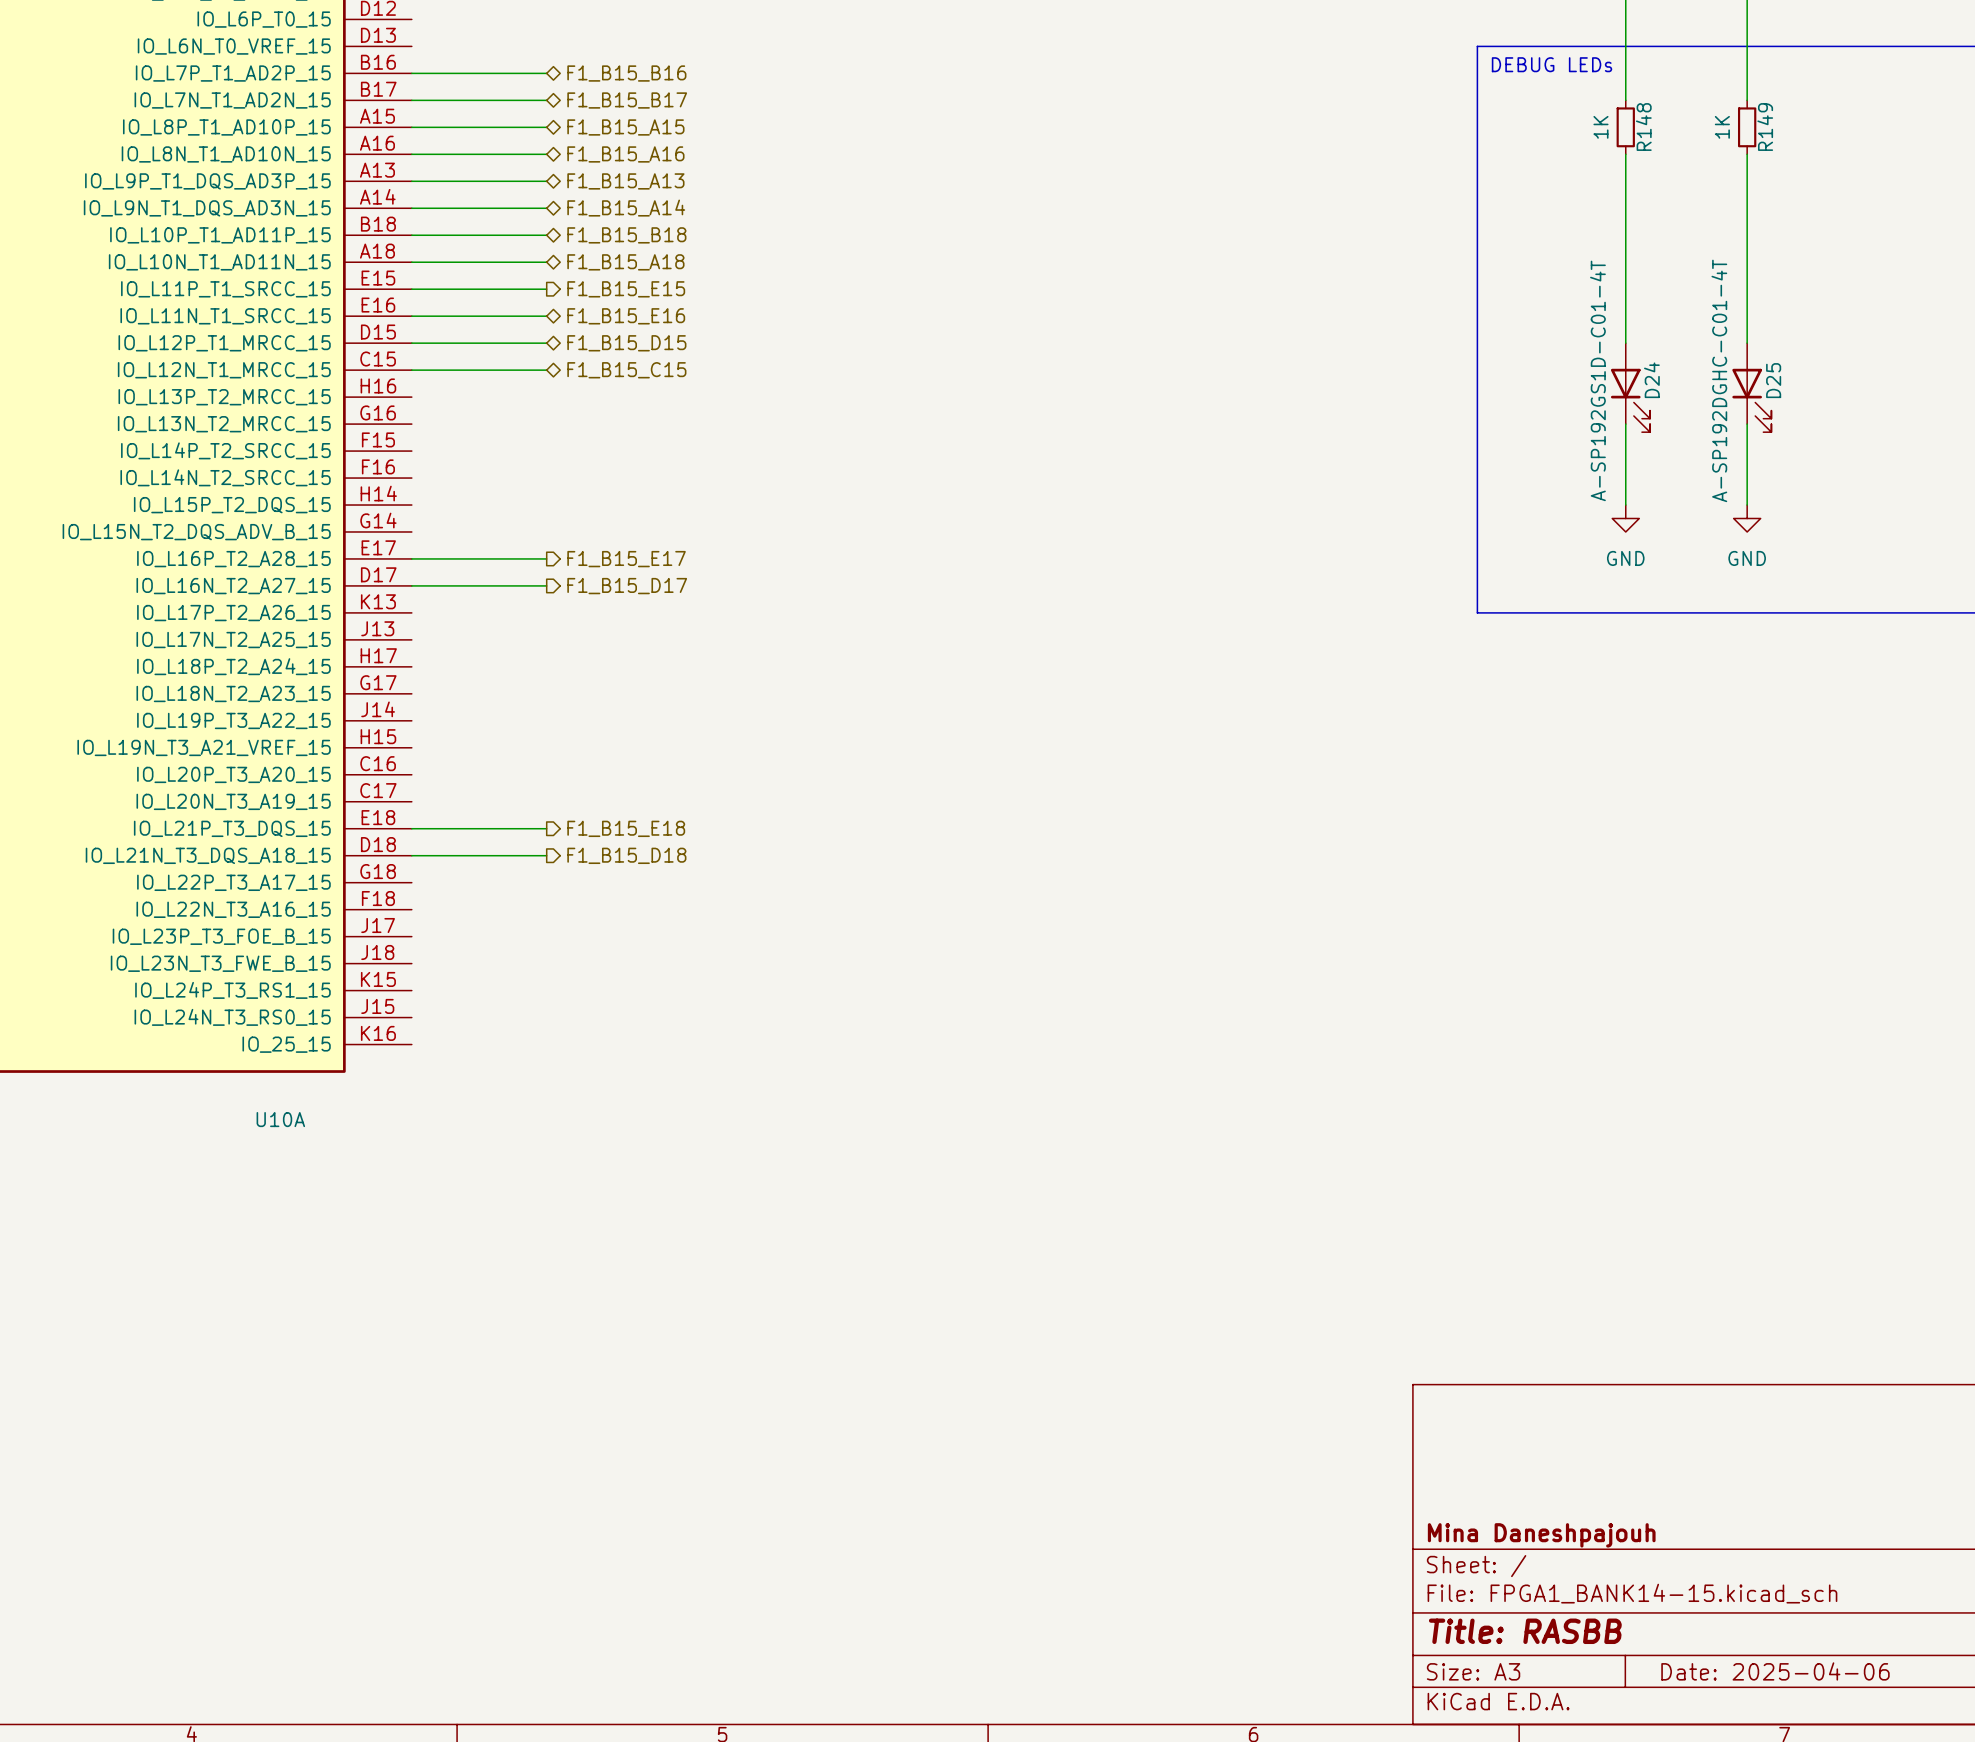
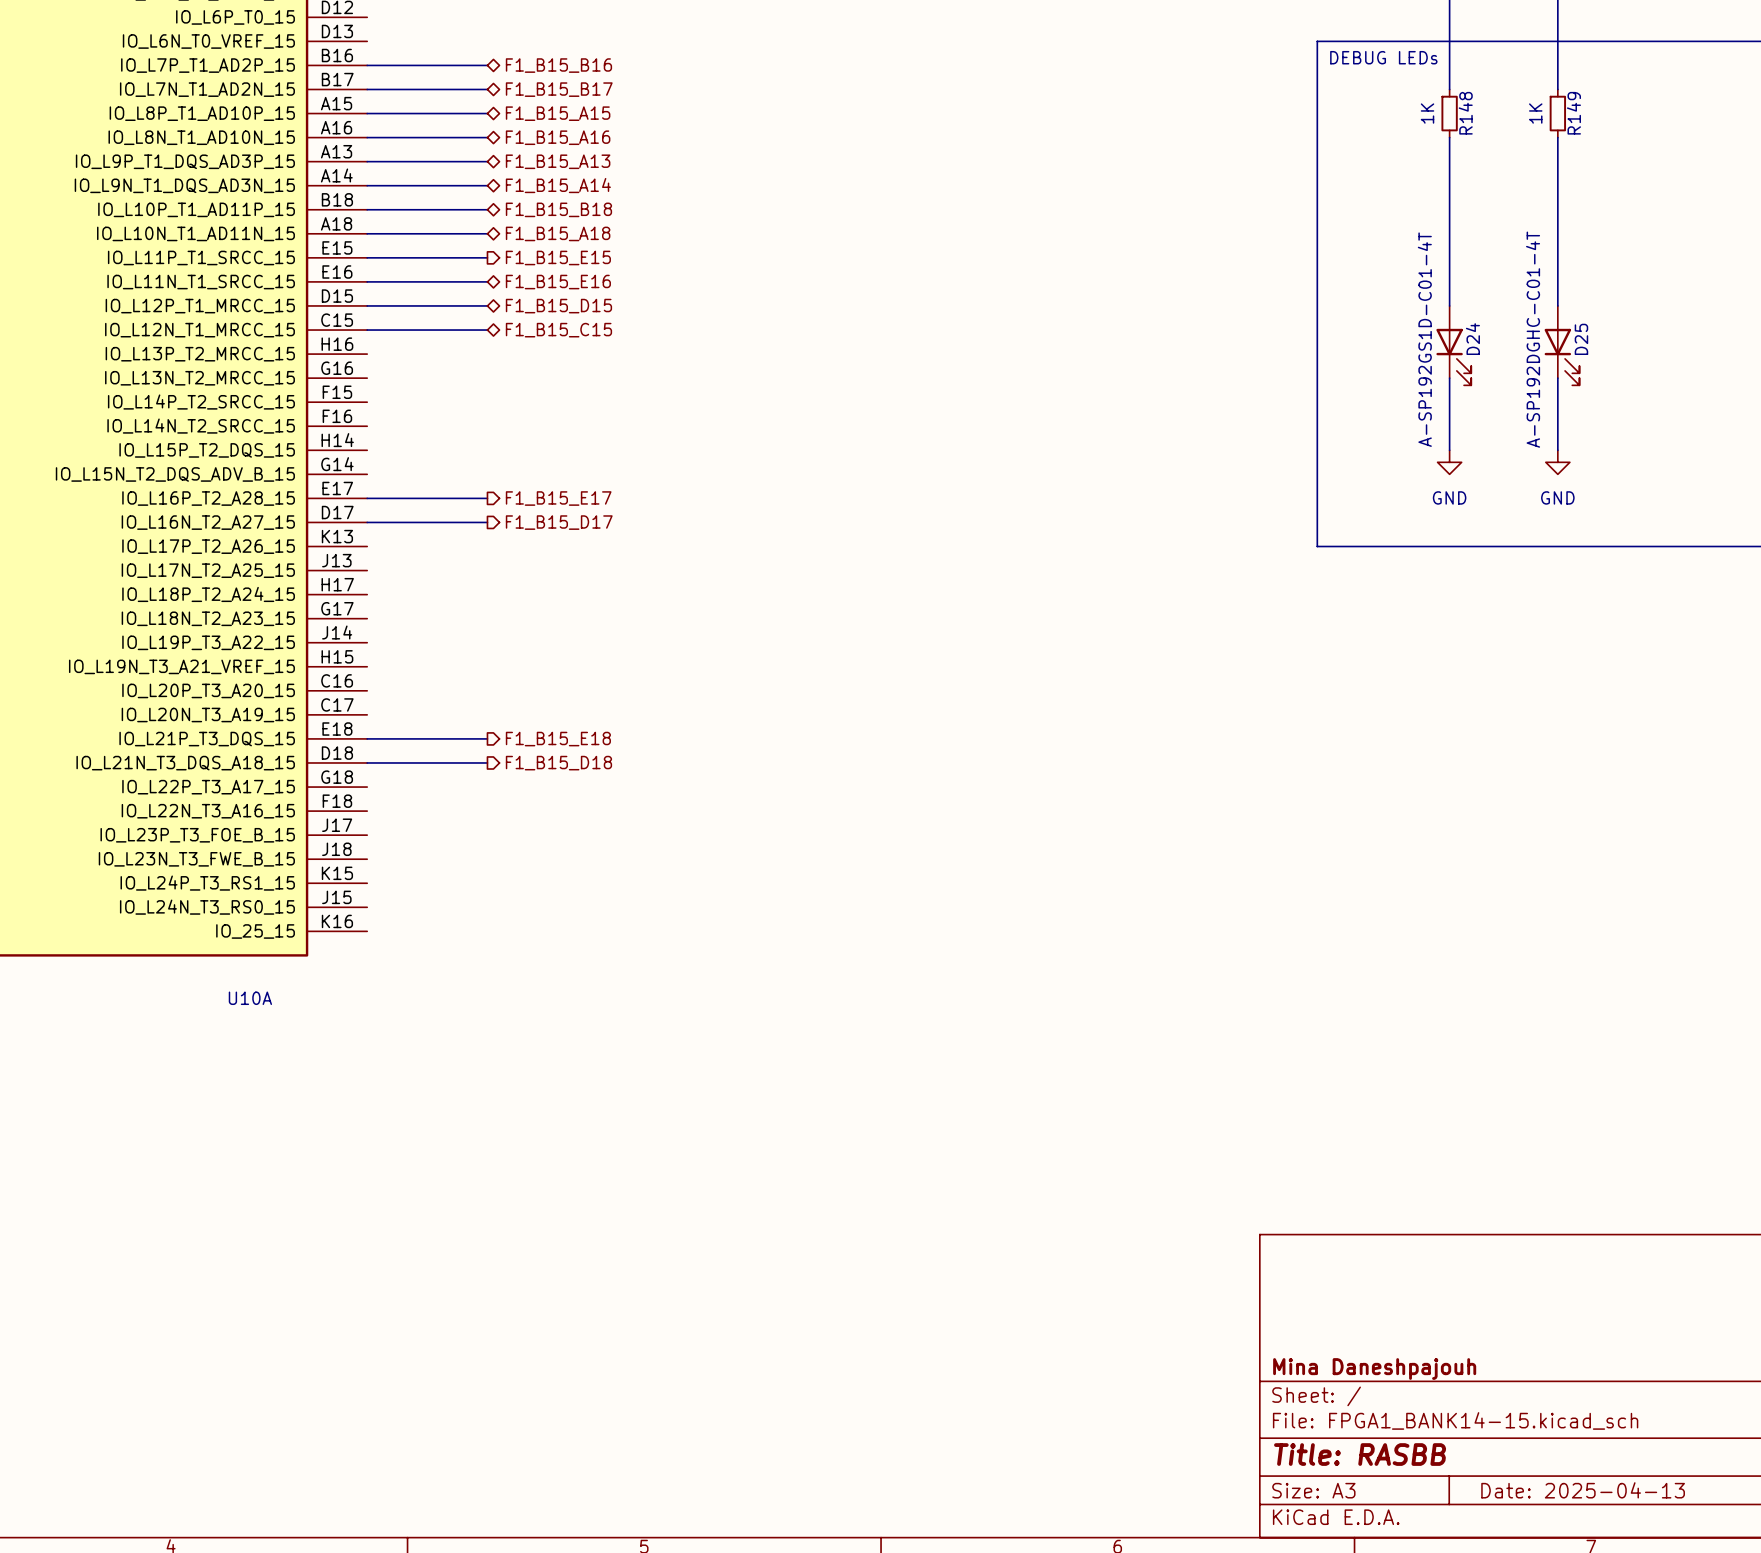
title block: Date: 2025-04-06 (1775, 1671) -> Date: 2025-04-13 (1583, 1490)

